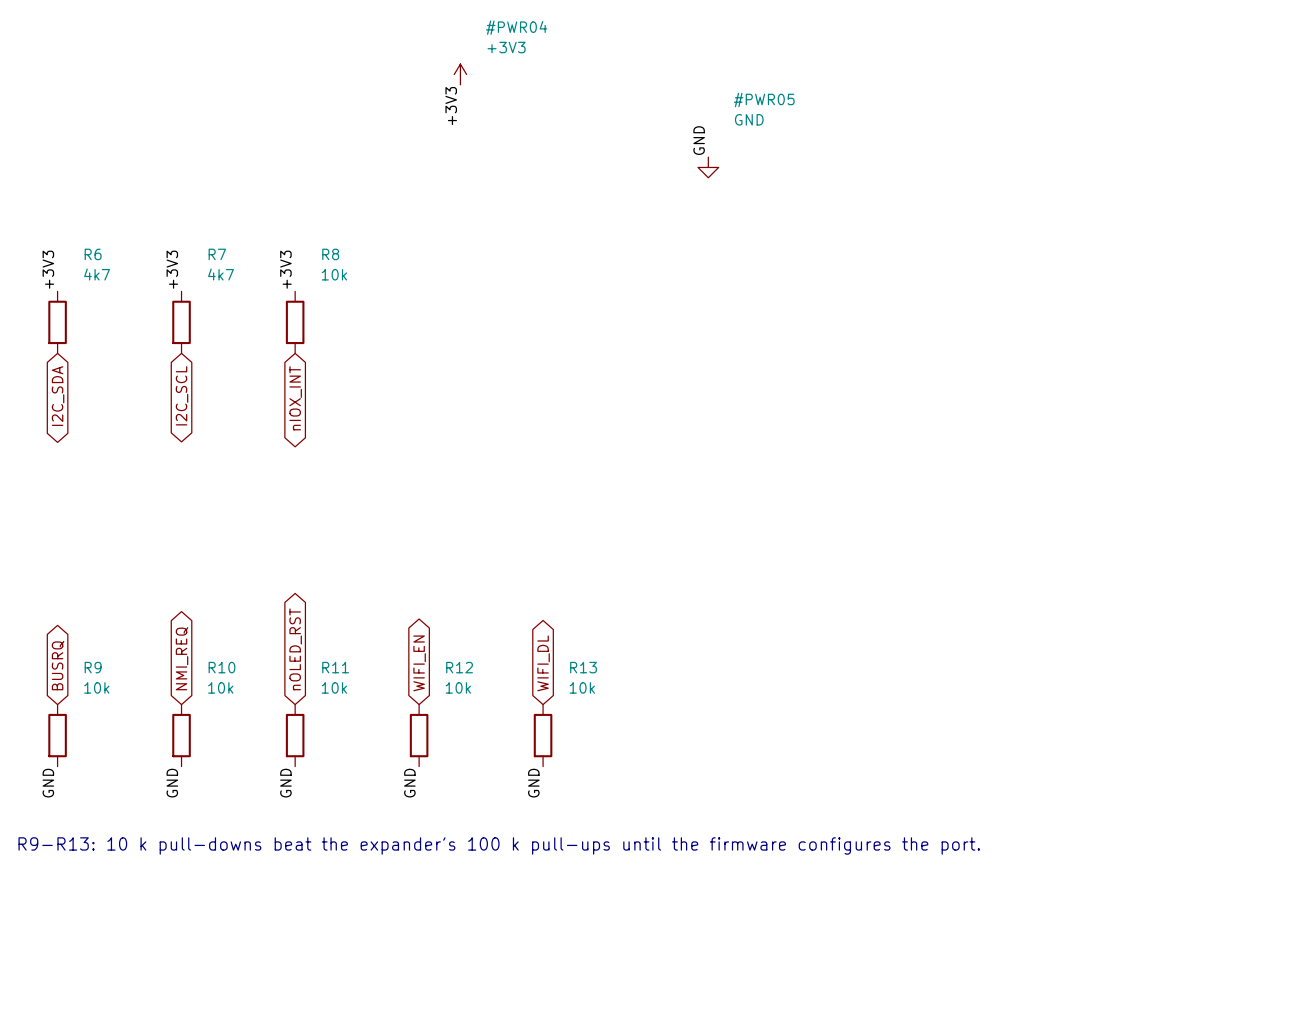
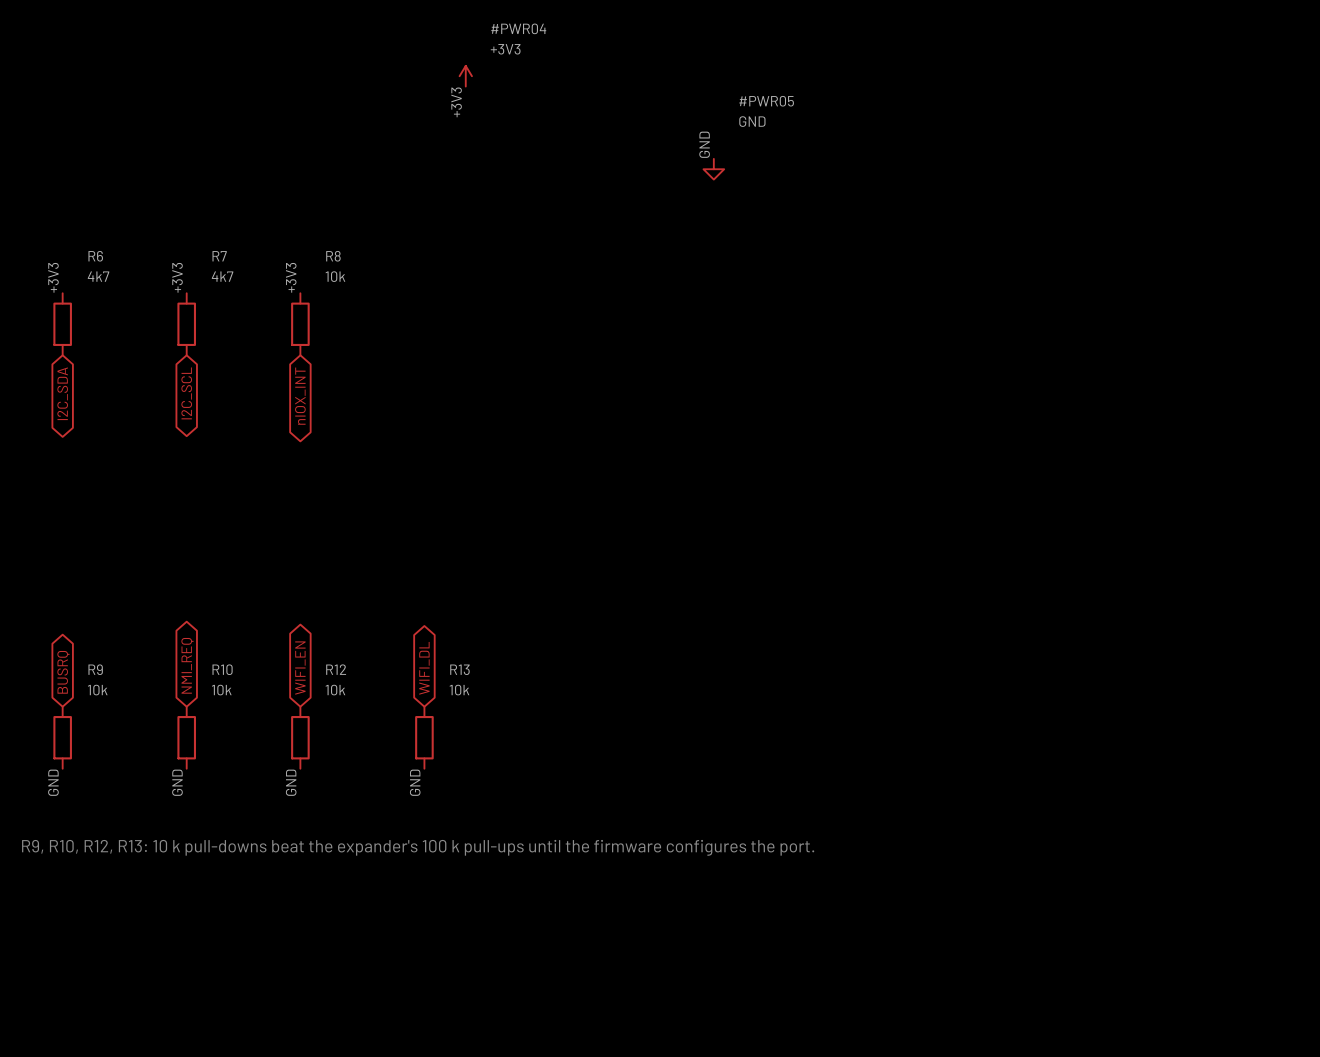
global label: nOLED_RST (295, 649) -> WIFI_EN (300, 668)
global label: WIFI_EN (419, 663) -> WIFI_DL (424, 668)
global label: WIFI_DL (543, 663) -> none
R11 name: R11 (335, 667) -> R12 (336, 669)
R12 name: R12 (459, 667) -> R13 (459, 669)
R13: 10k (543, 735) -> none
label: GND (533, 783) -> none
text: R9-R13: 10 k pull-downs beat the expander's 100 k pull-ups until the firmware configures the port. (499, 845) -> R9, R10, R12, R13: 10 k pull-downs beat the expander's 100 k pull-ups until the firmware configures the port. (418, 847)

